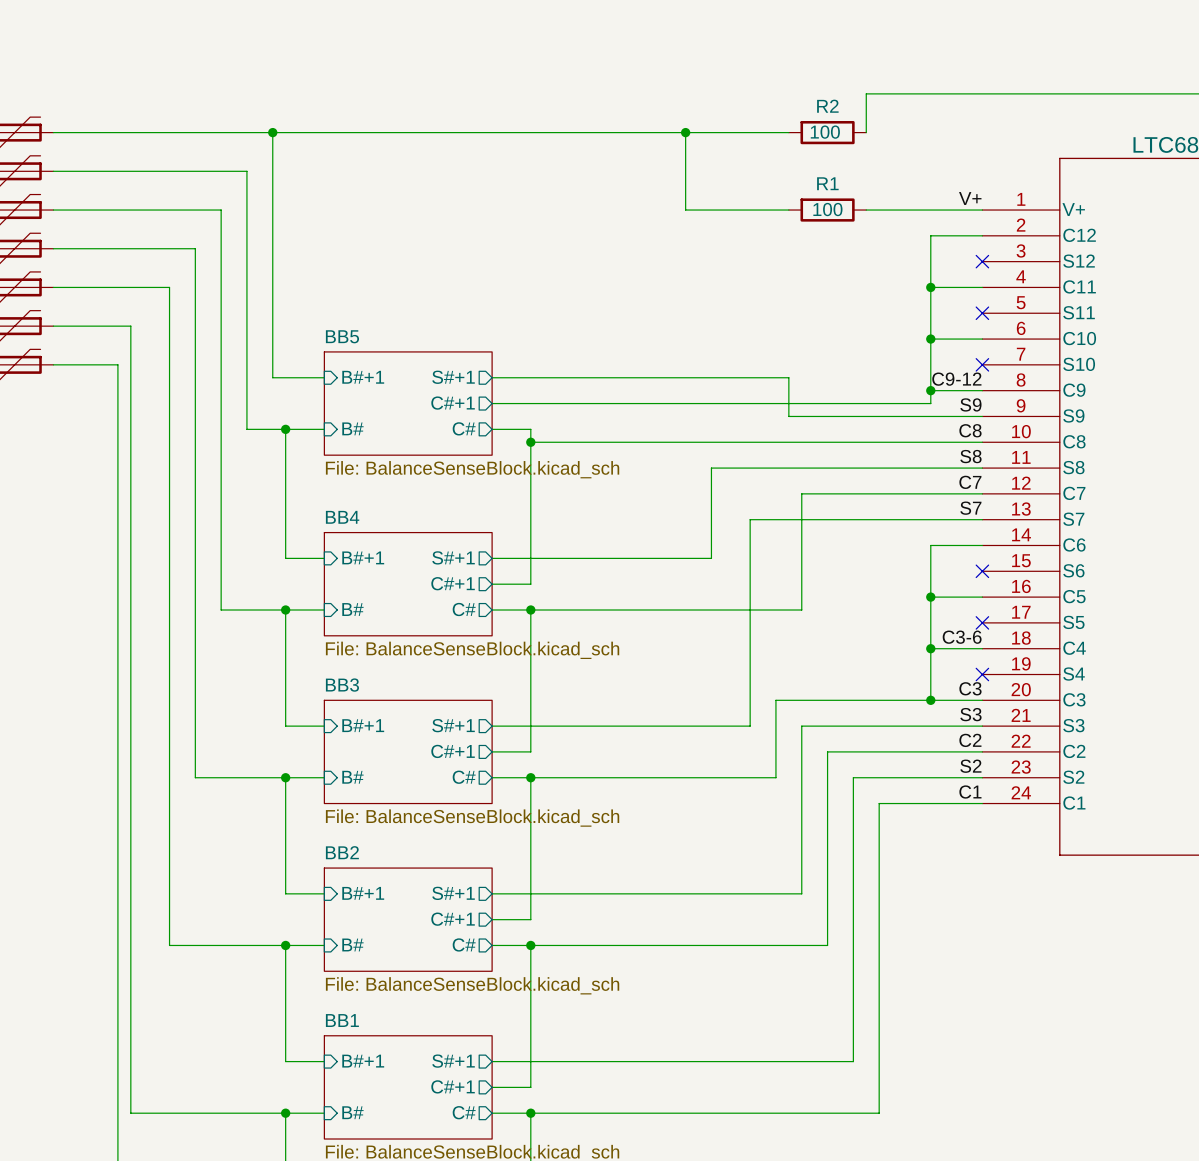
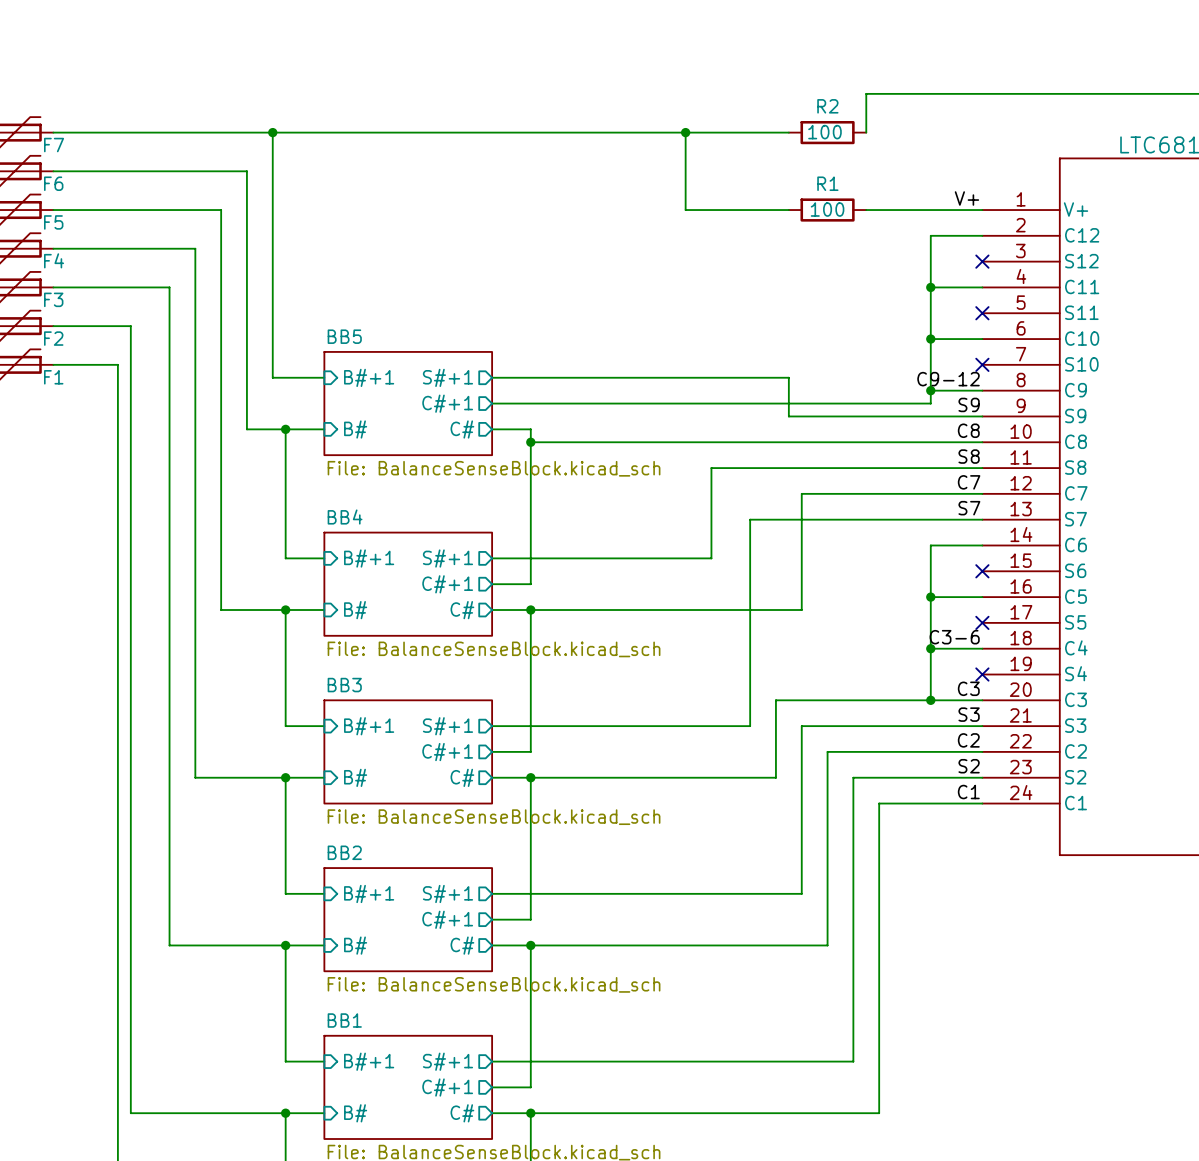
F7 name: none -> F7 (54, 145)
F6 name: none -> F6 (53, 183)
F5 name: none -> F5 (53, 222)
F4 name: none -> F4 (54, 260)
F3 name: none -> F3 (53, 299)
F2 name: none -> F2 (53, 338)
F1 name: none -> F1 (53, 377)

